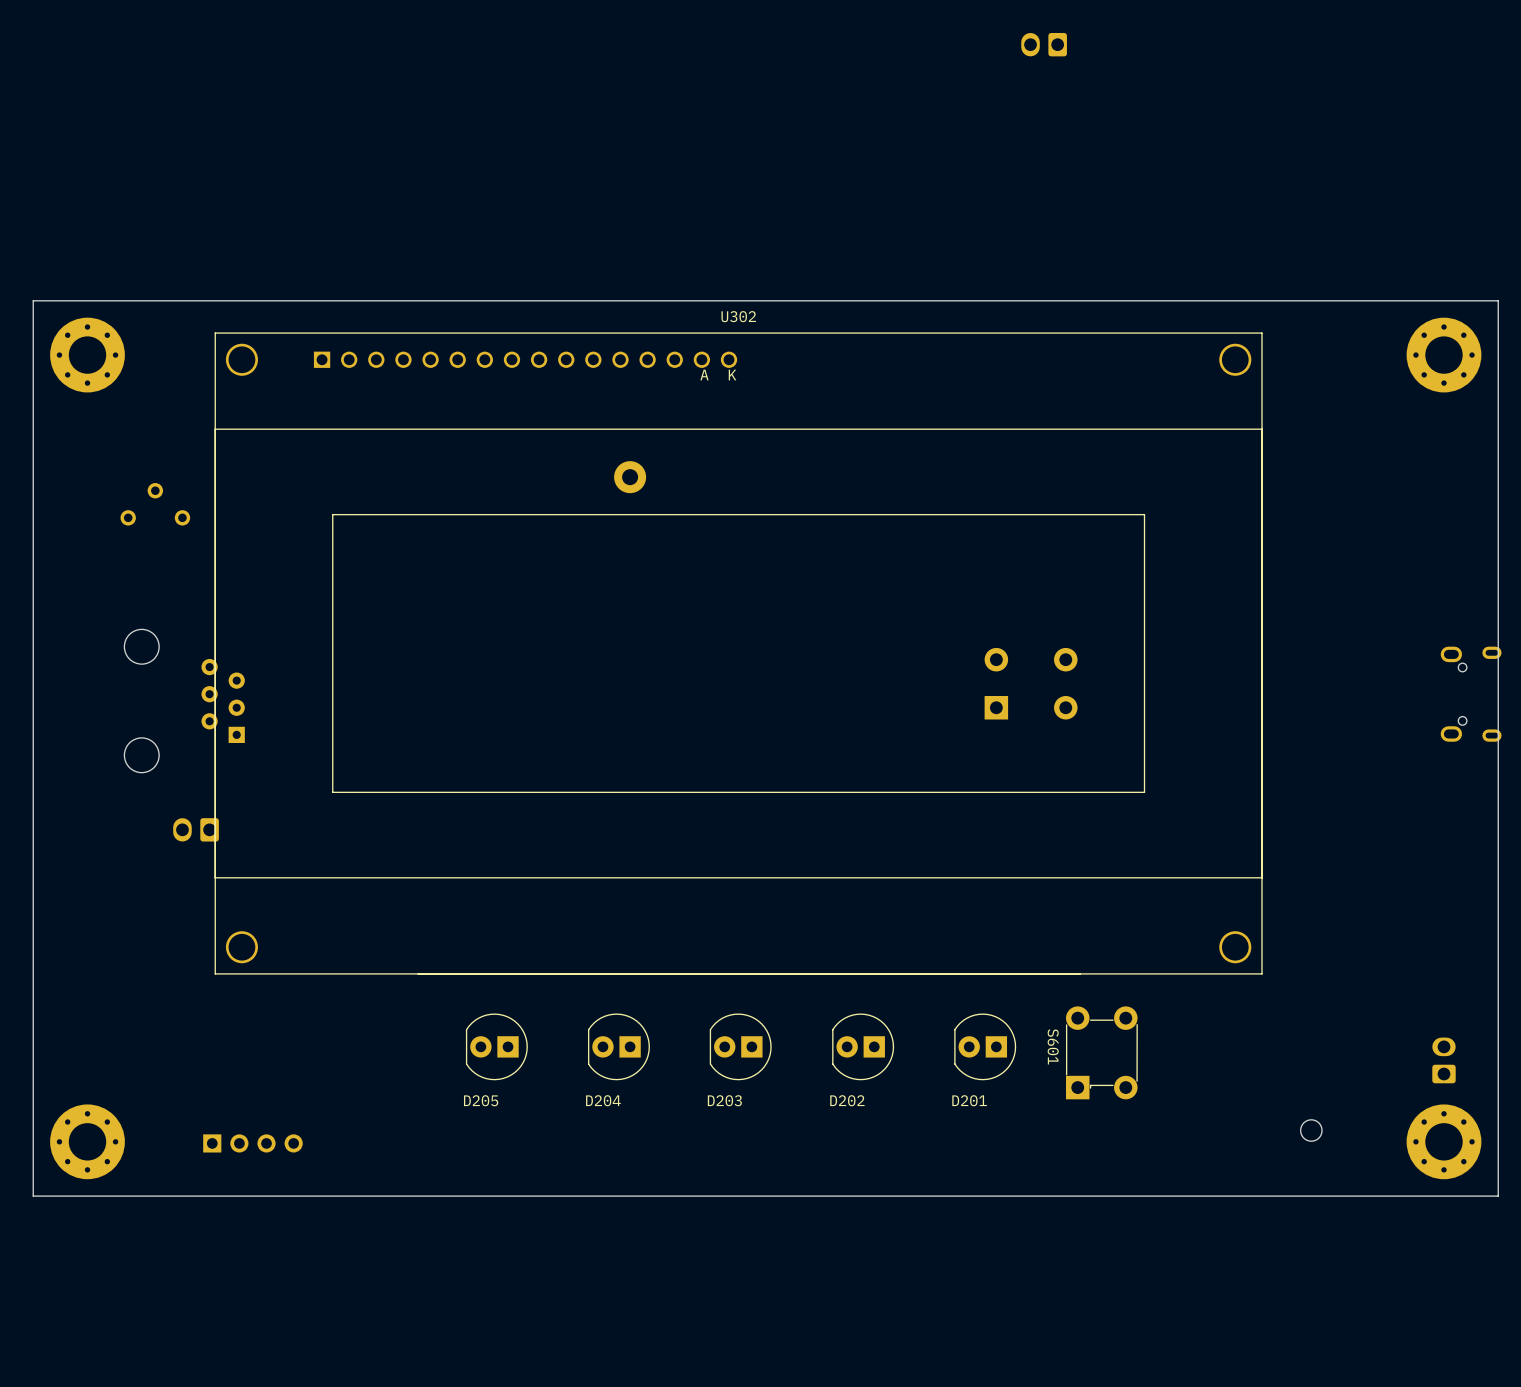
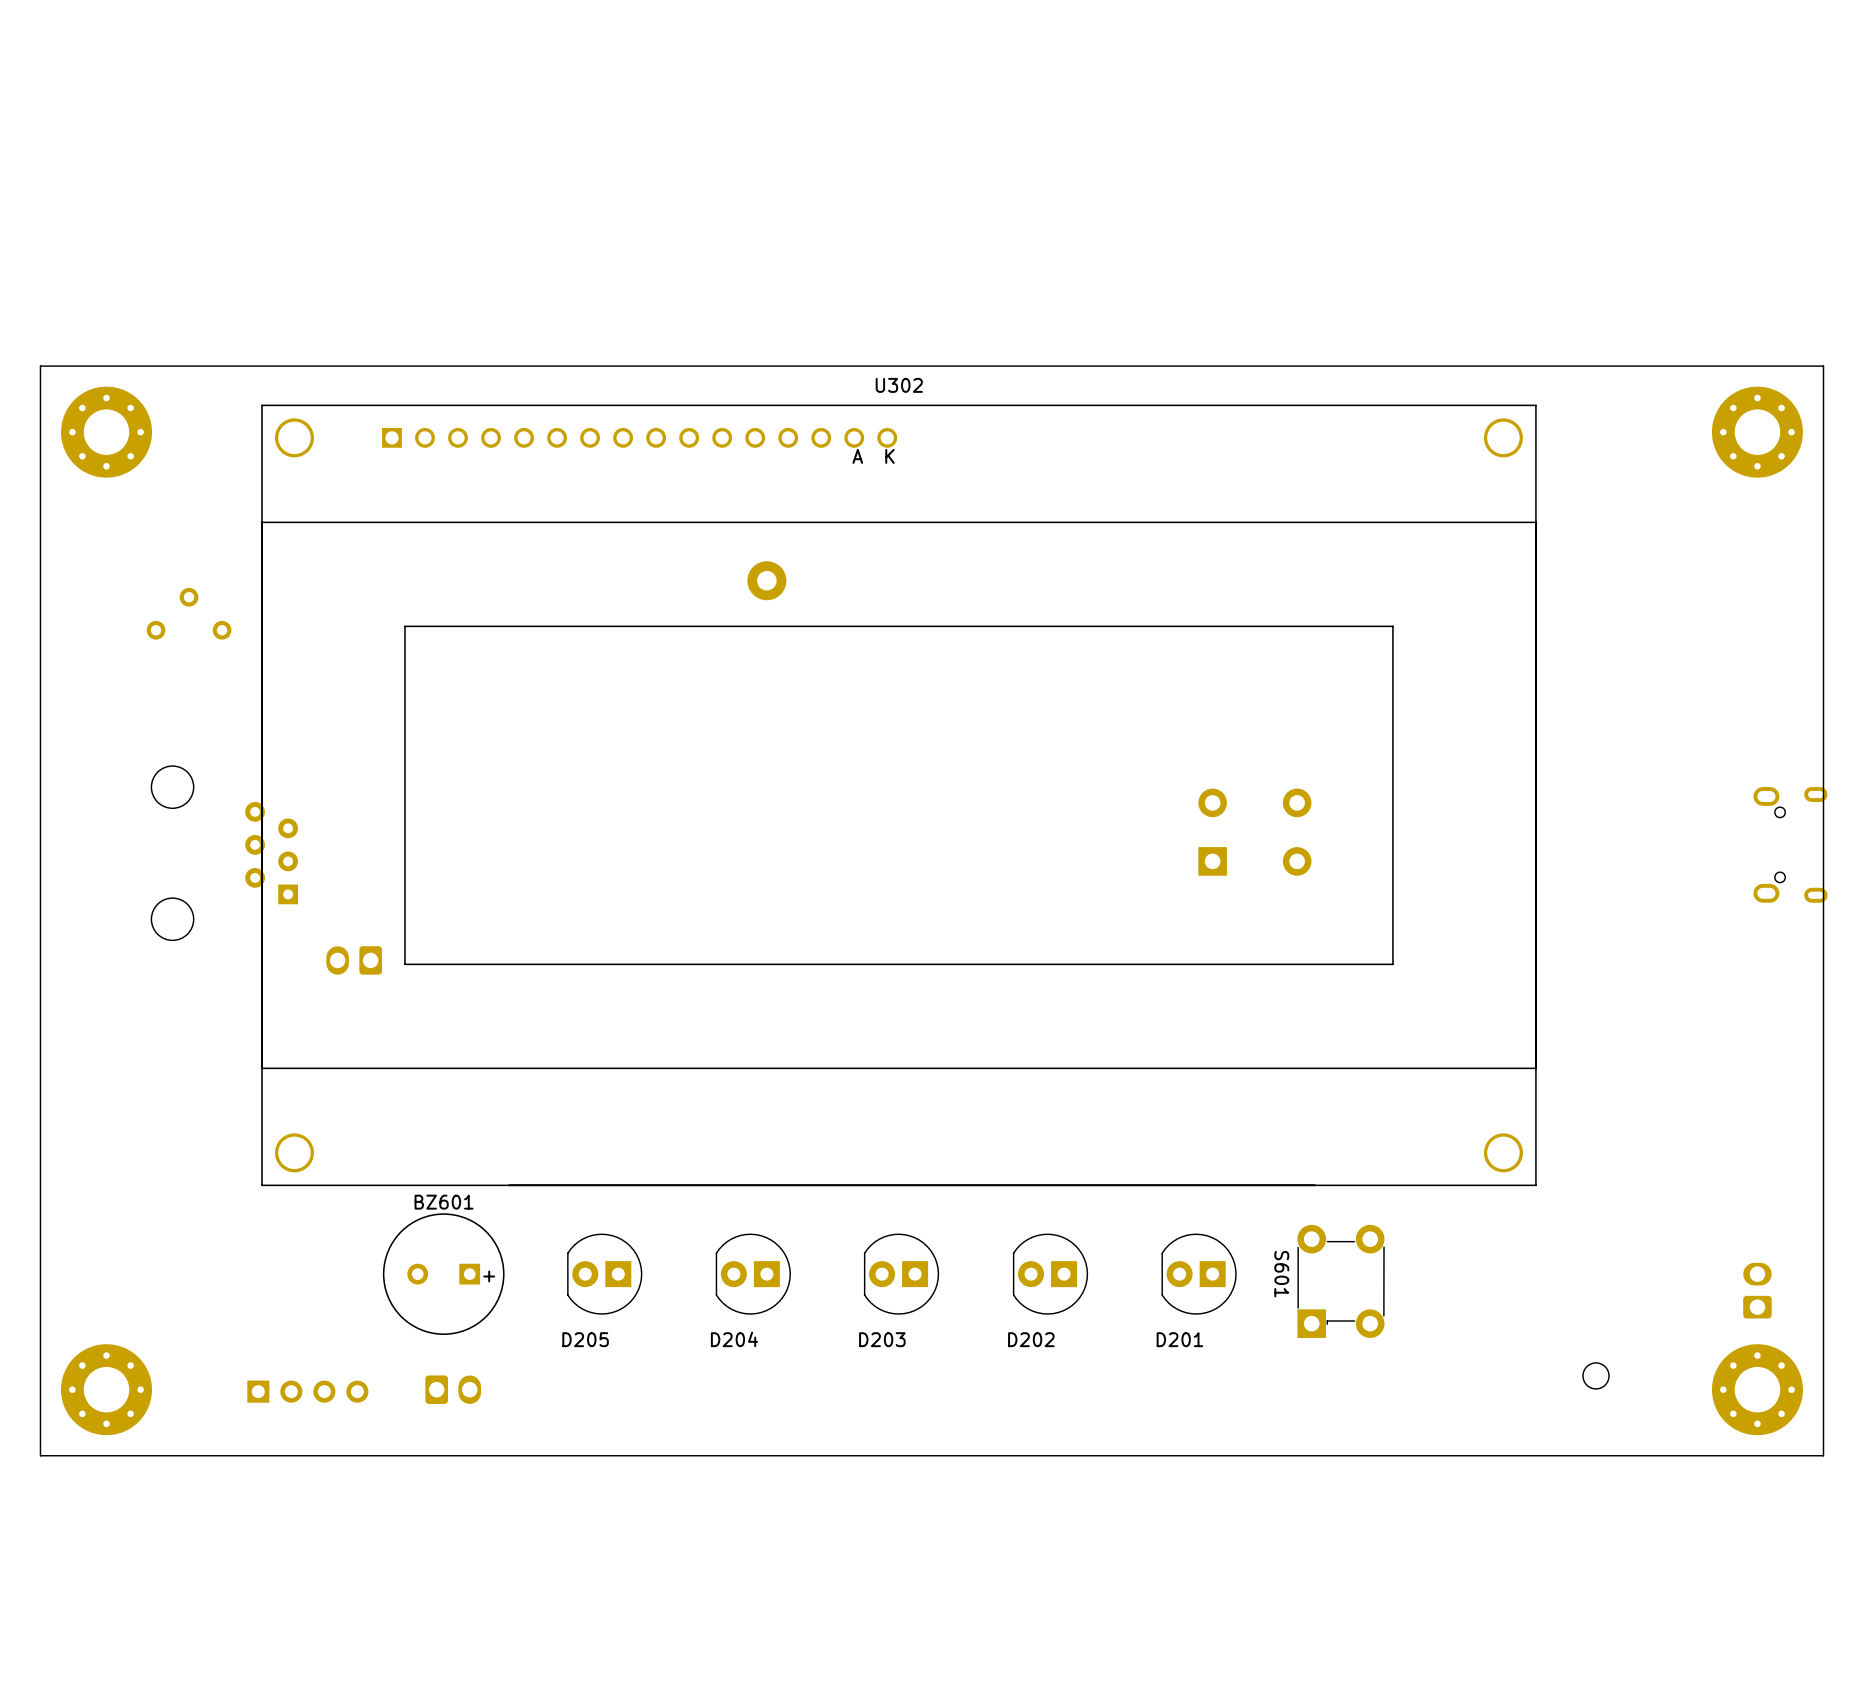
part: (1044, 44) -> none
part position: (196, 829) -> (354, 960)
BZ601: none -> (443, 1274)
part: none -> (453, 1389)

